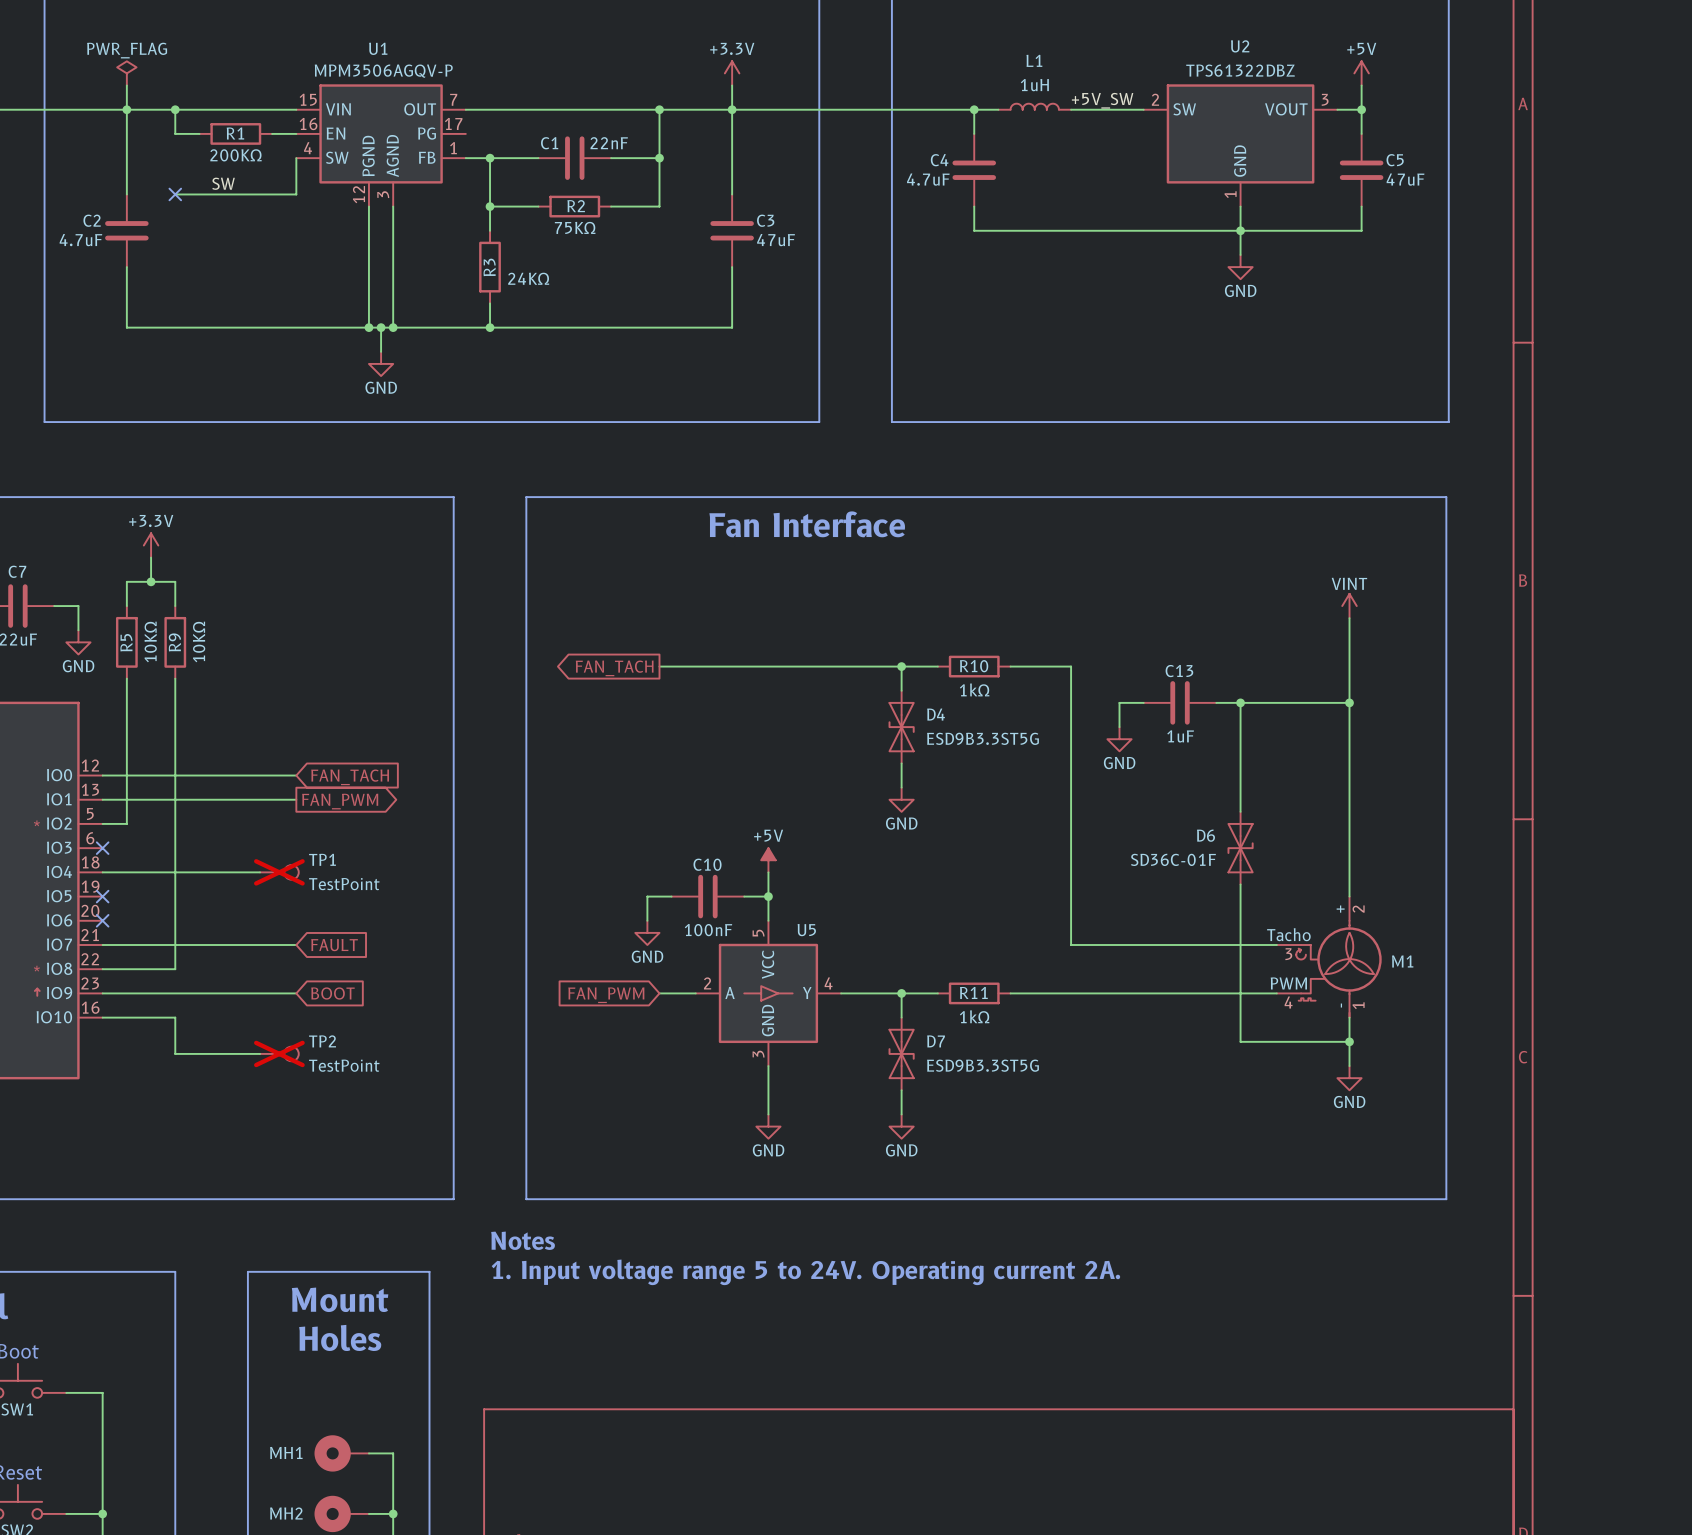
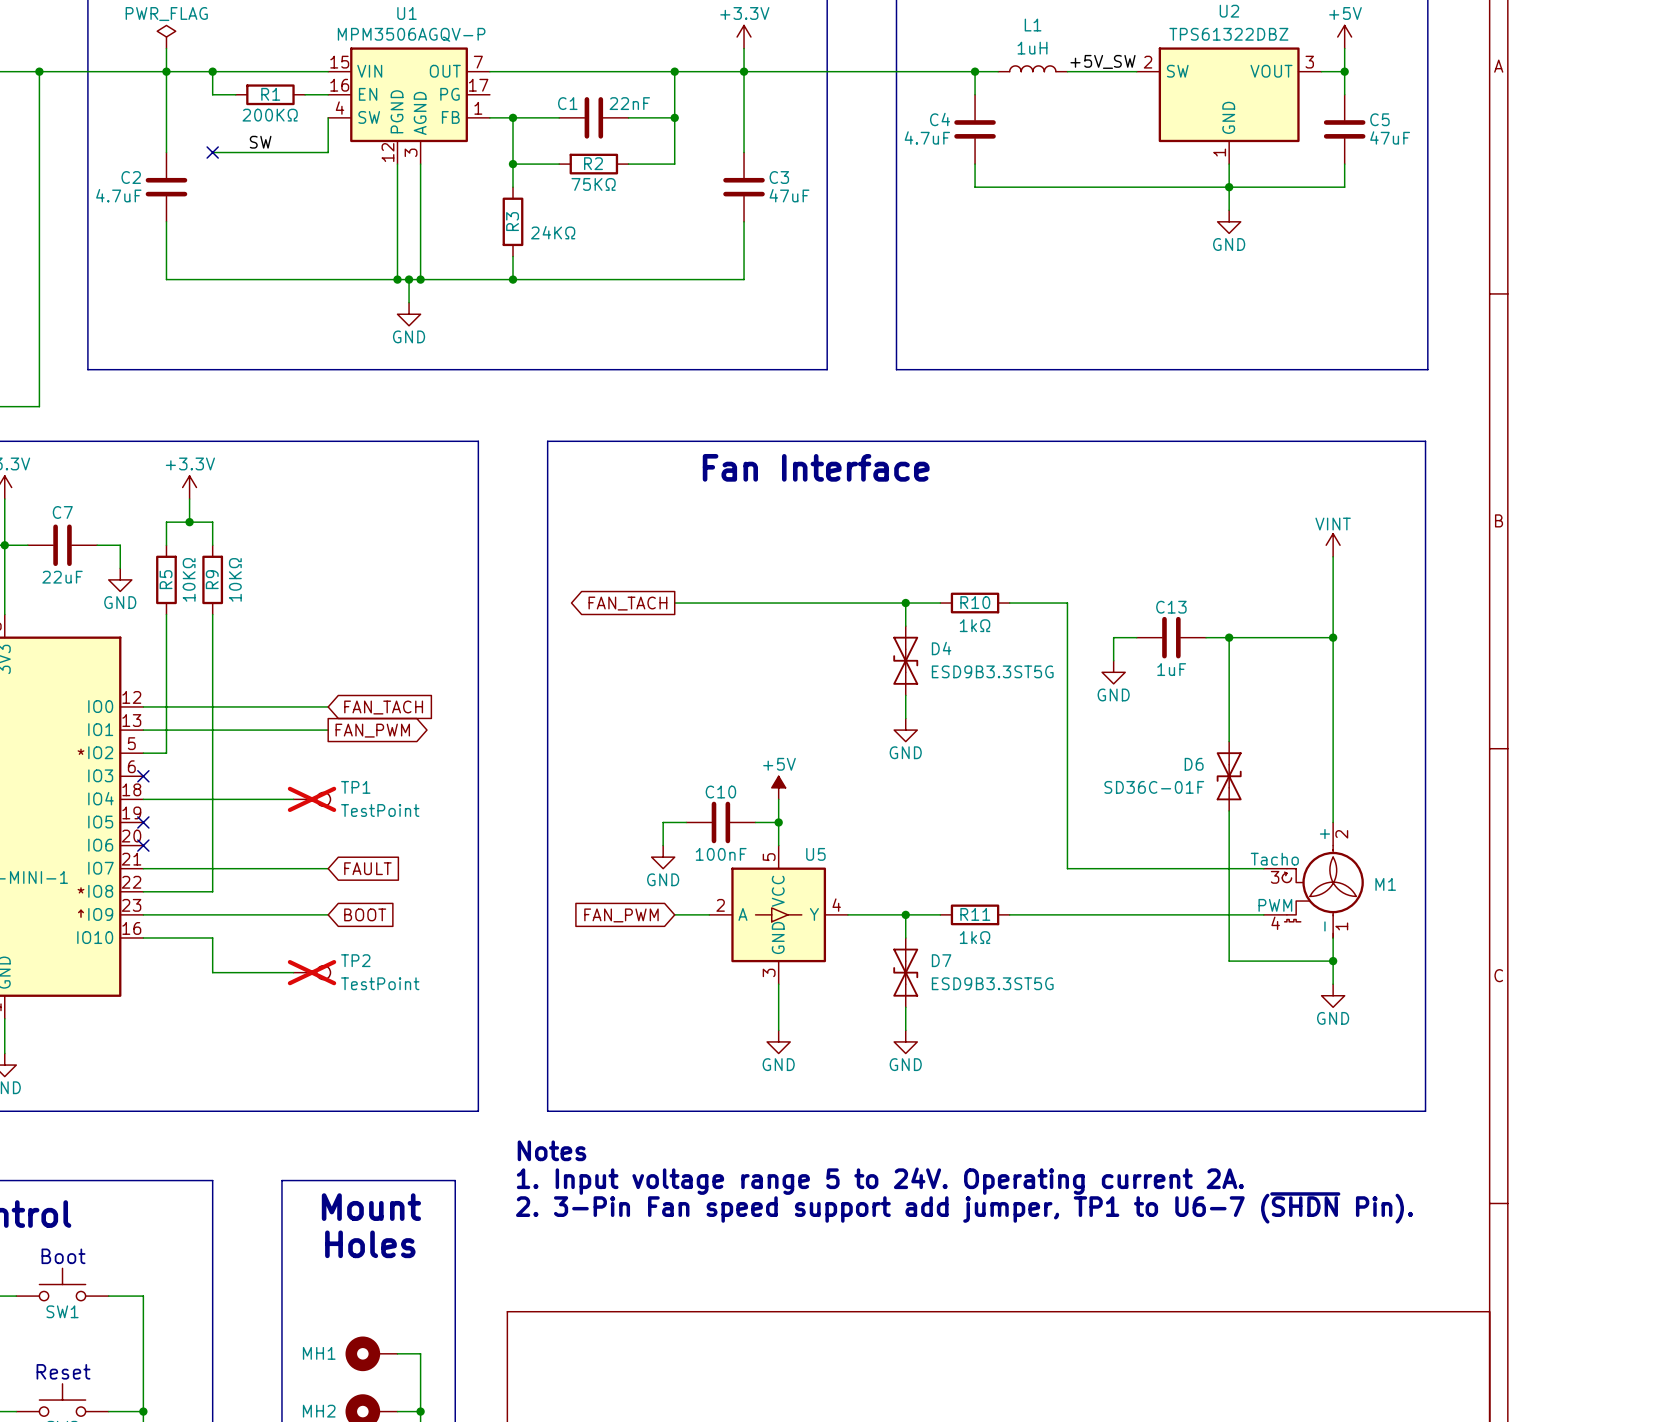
text: none -> 2. 3-Pin Fan speed support add jumper, TP1 to U6-7 (~{SHDN} Pin). (964, 1207)

